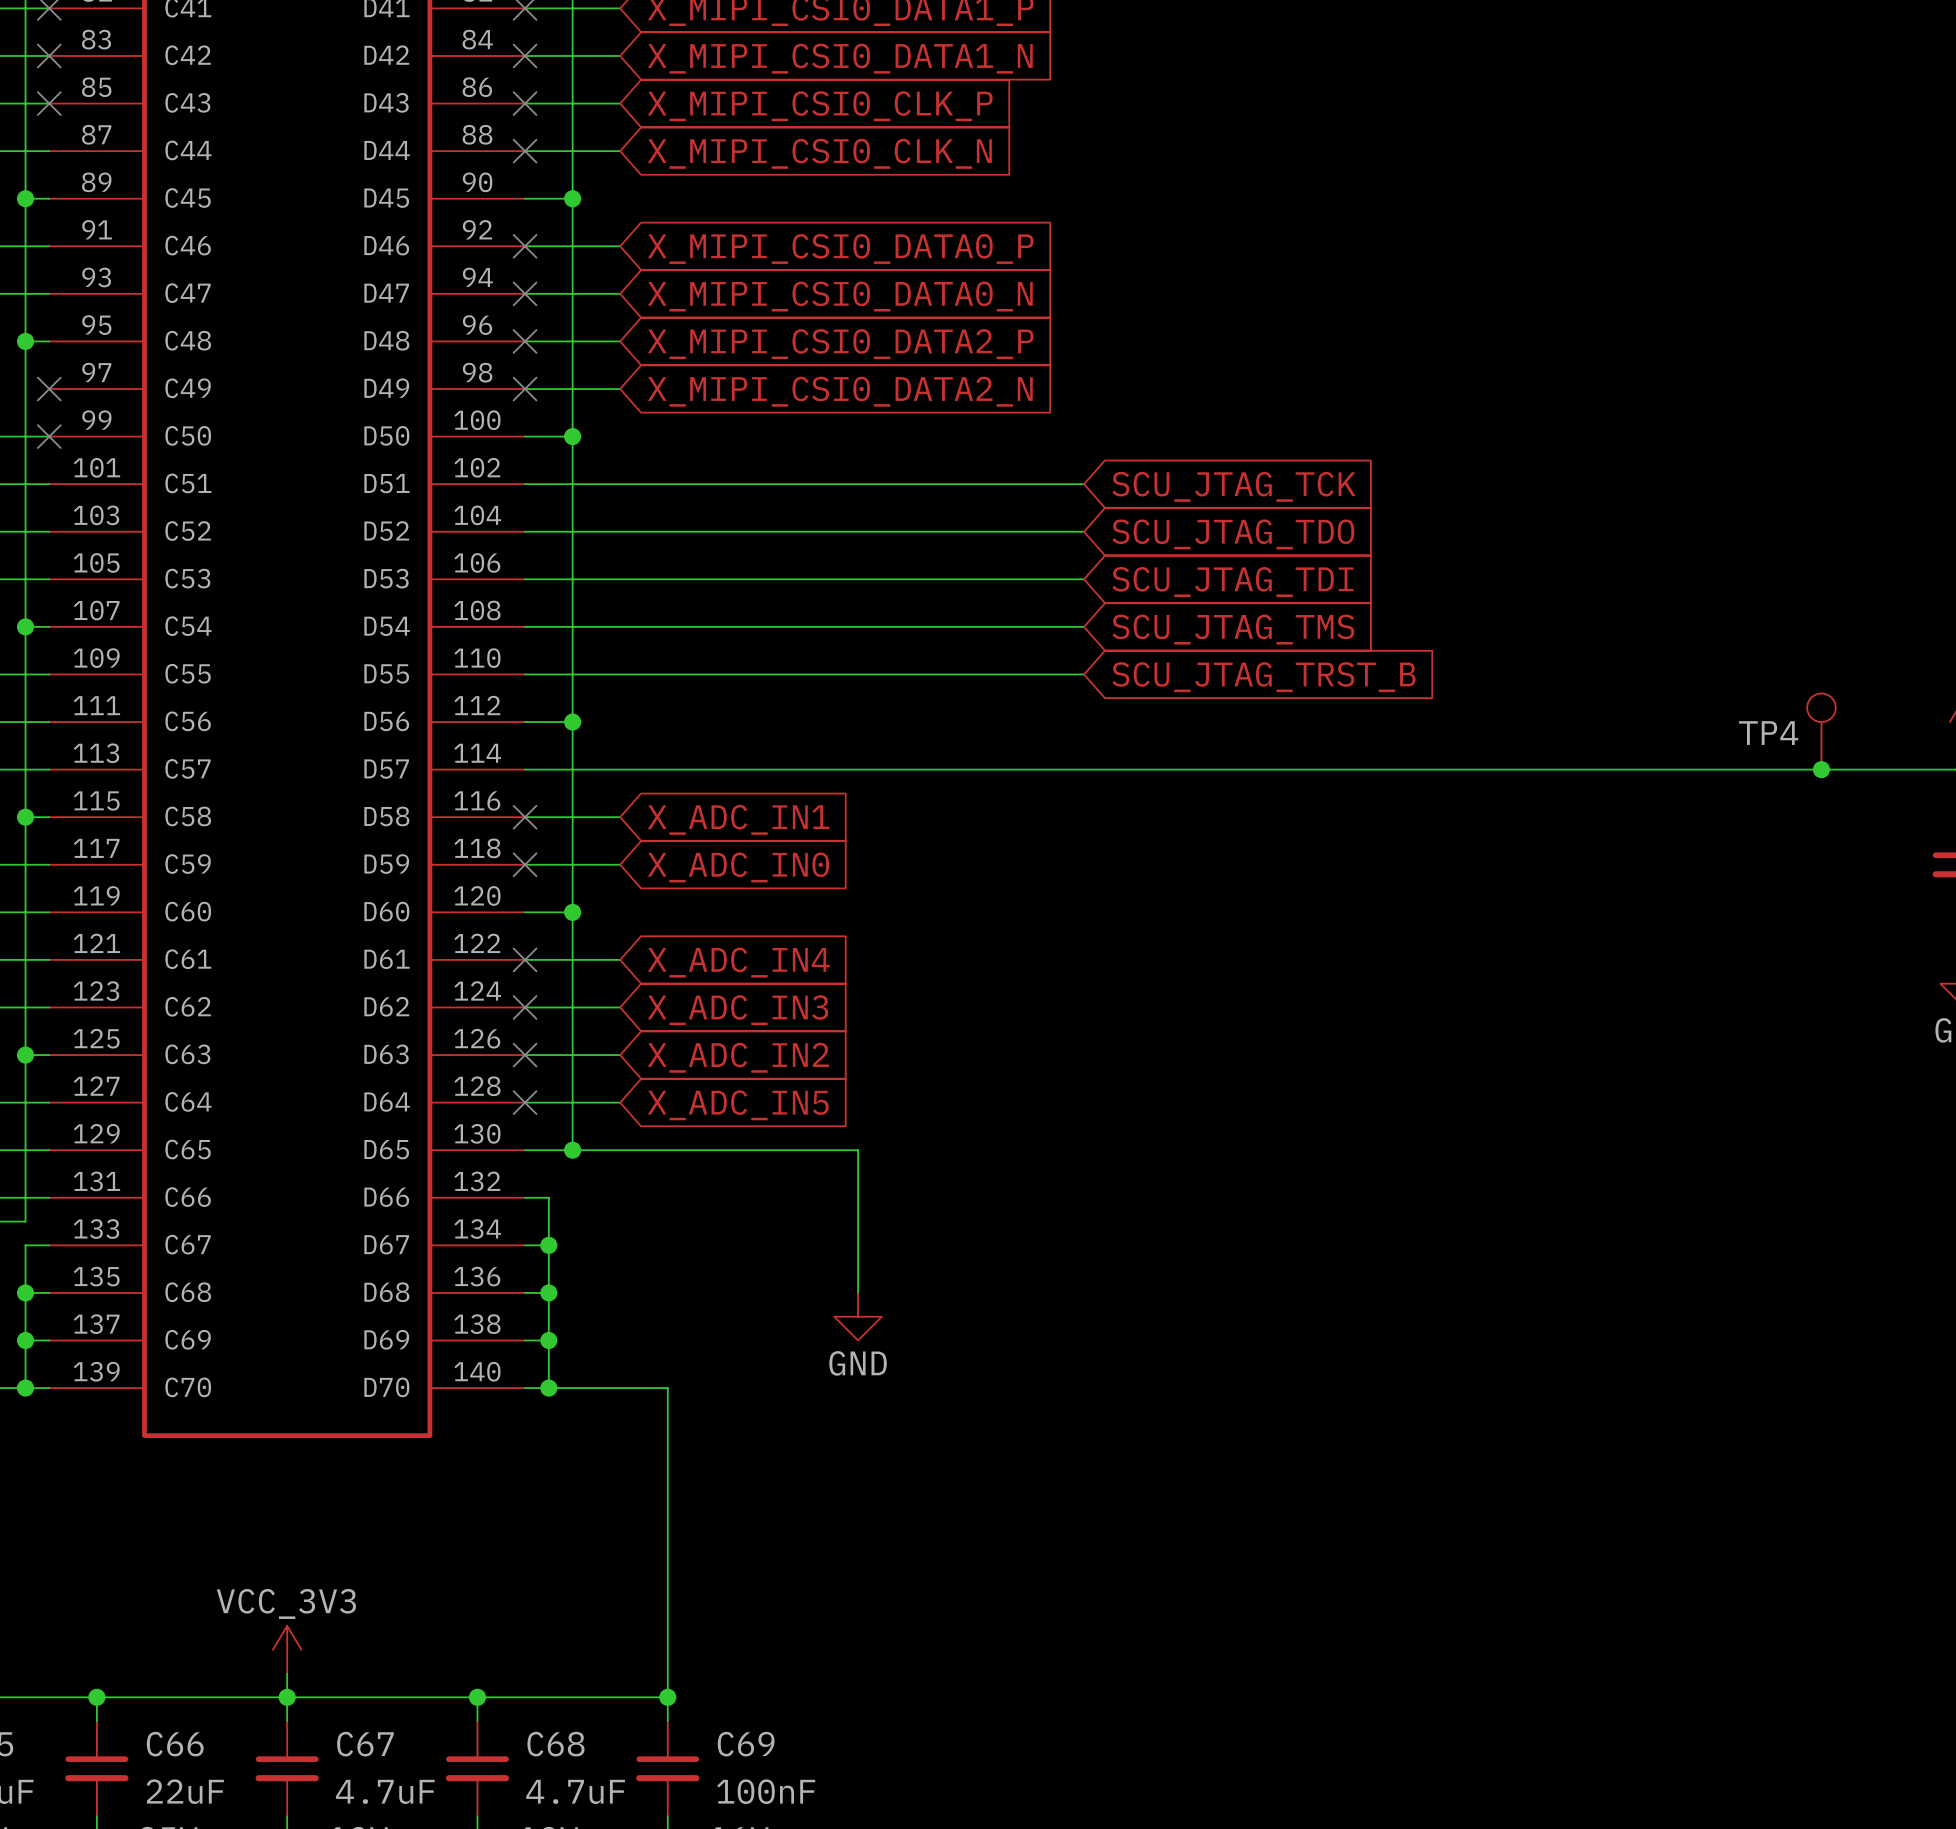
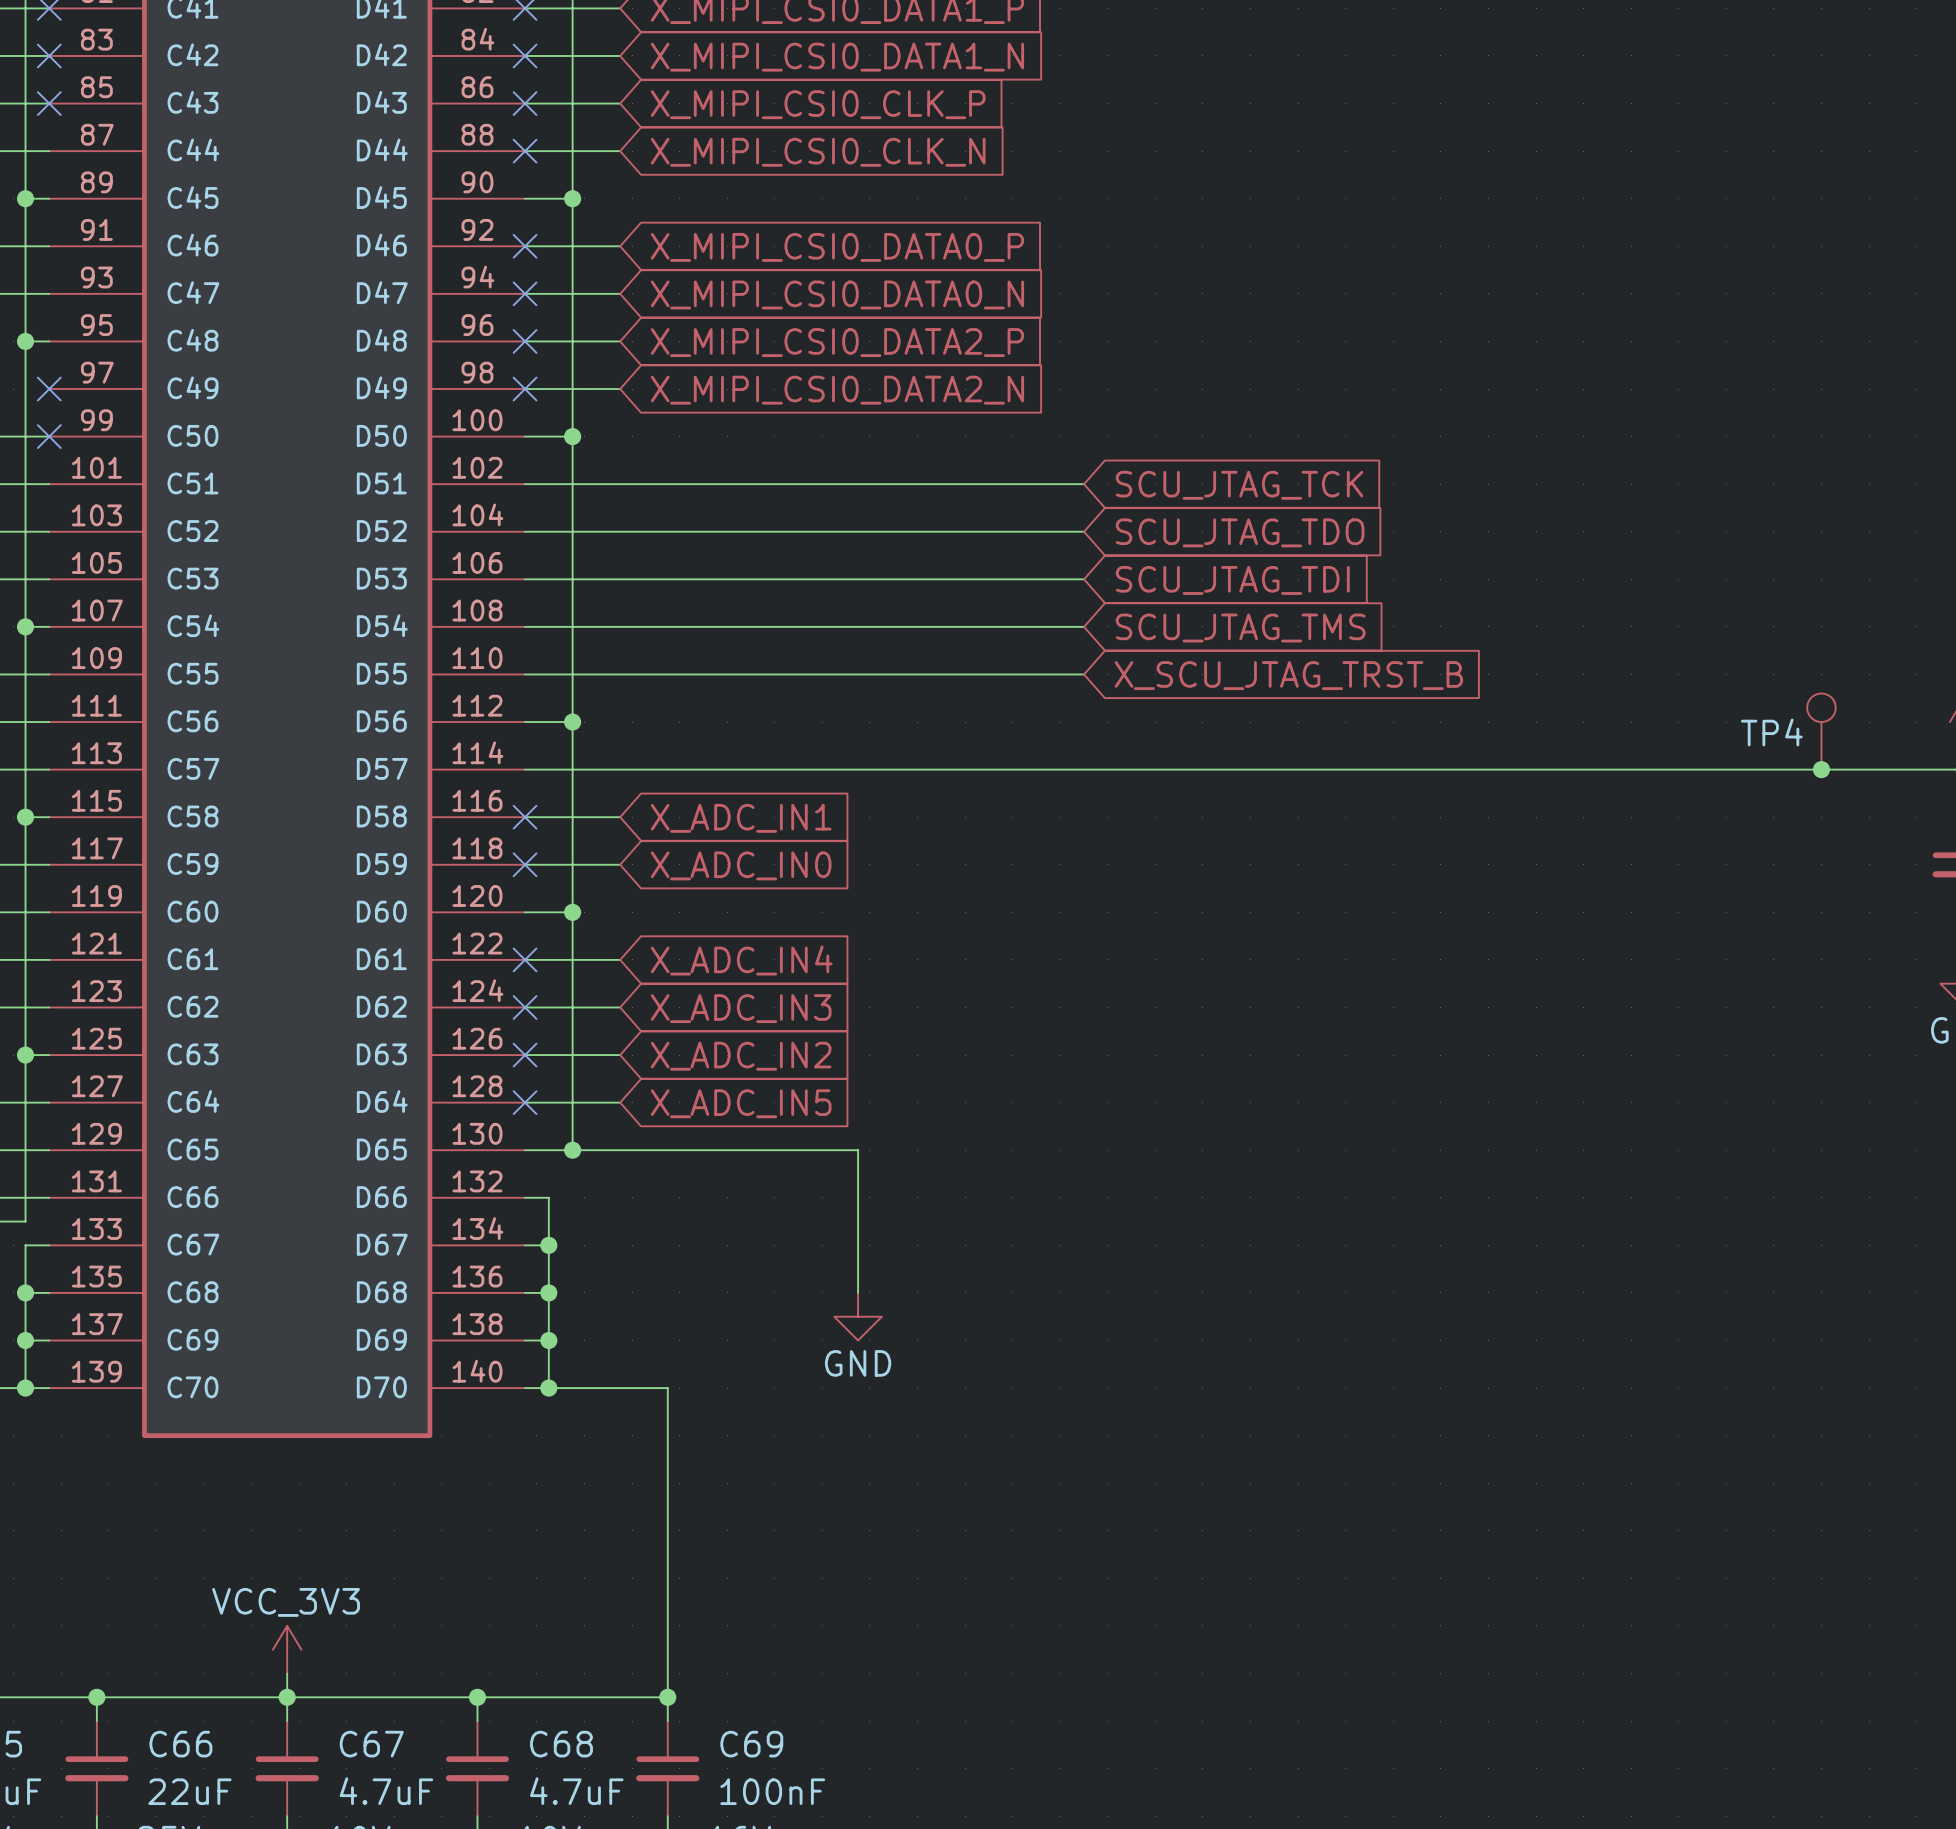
global label: SCU_JTAG_TRST_B (1263, 677) -> X_SCU_JTAG_TRST_B (1288, 675)

